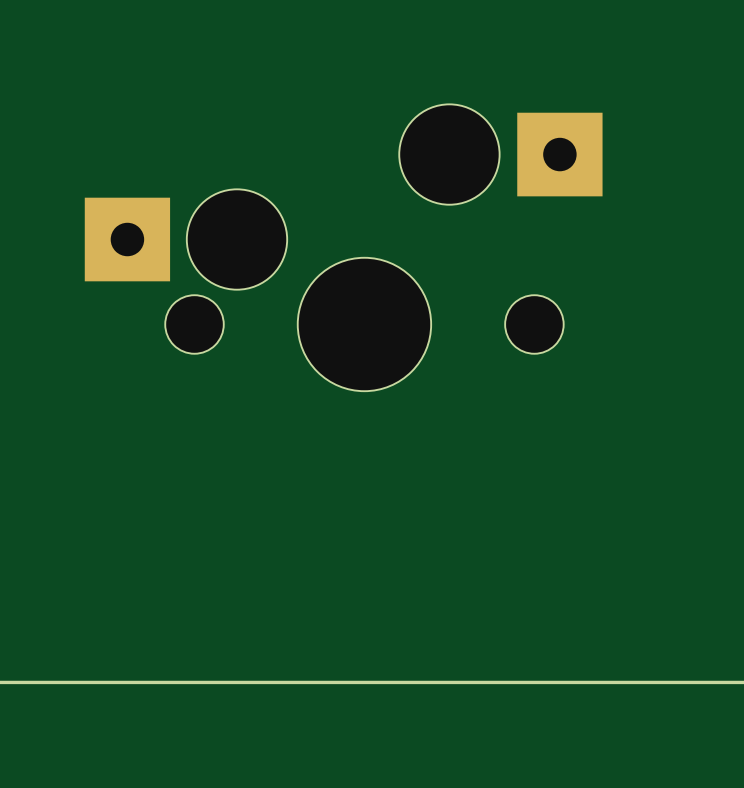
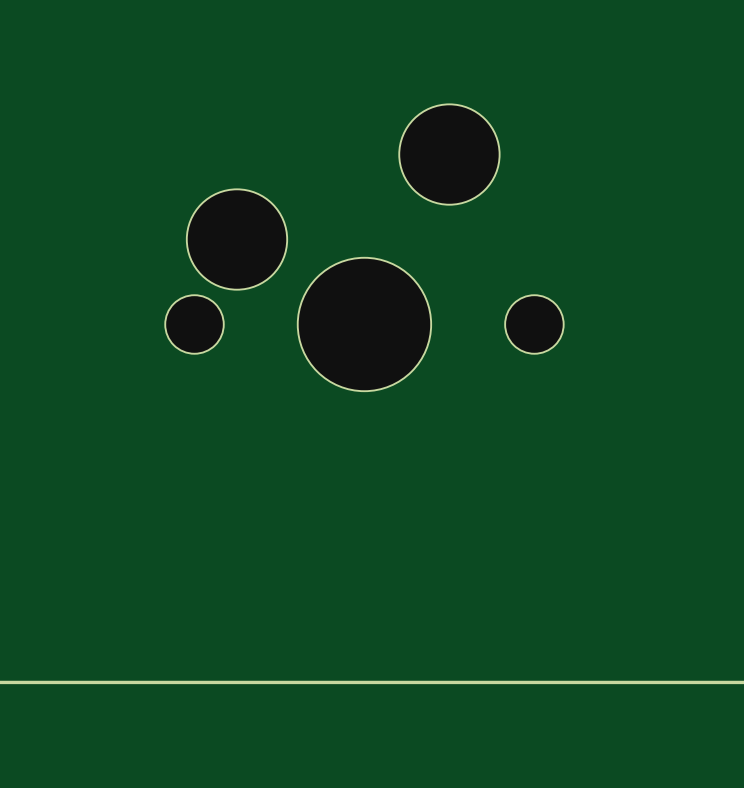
part footprint: [84, 104, 603, 392] -> [165, 104, 564, 392]

